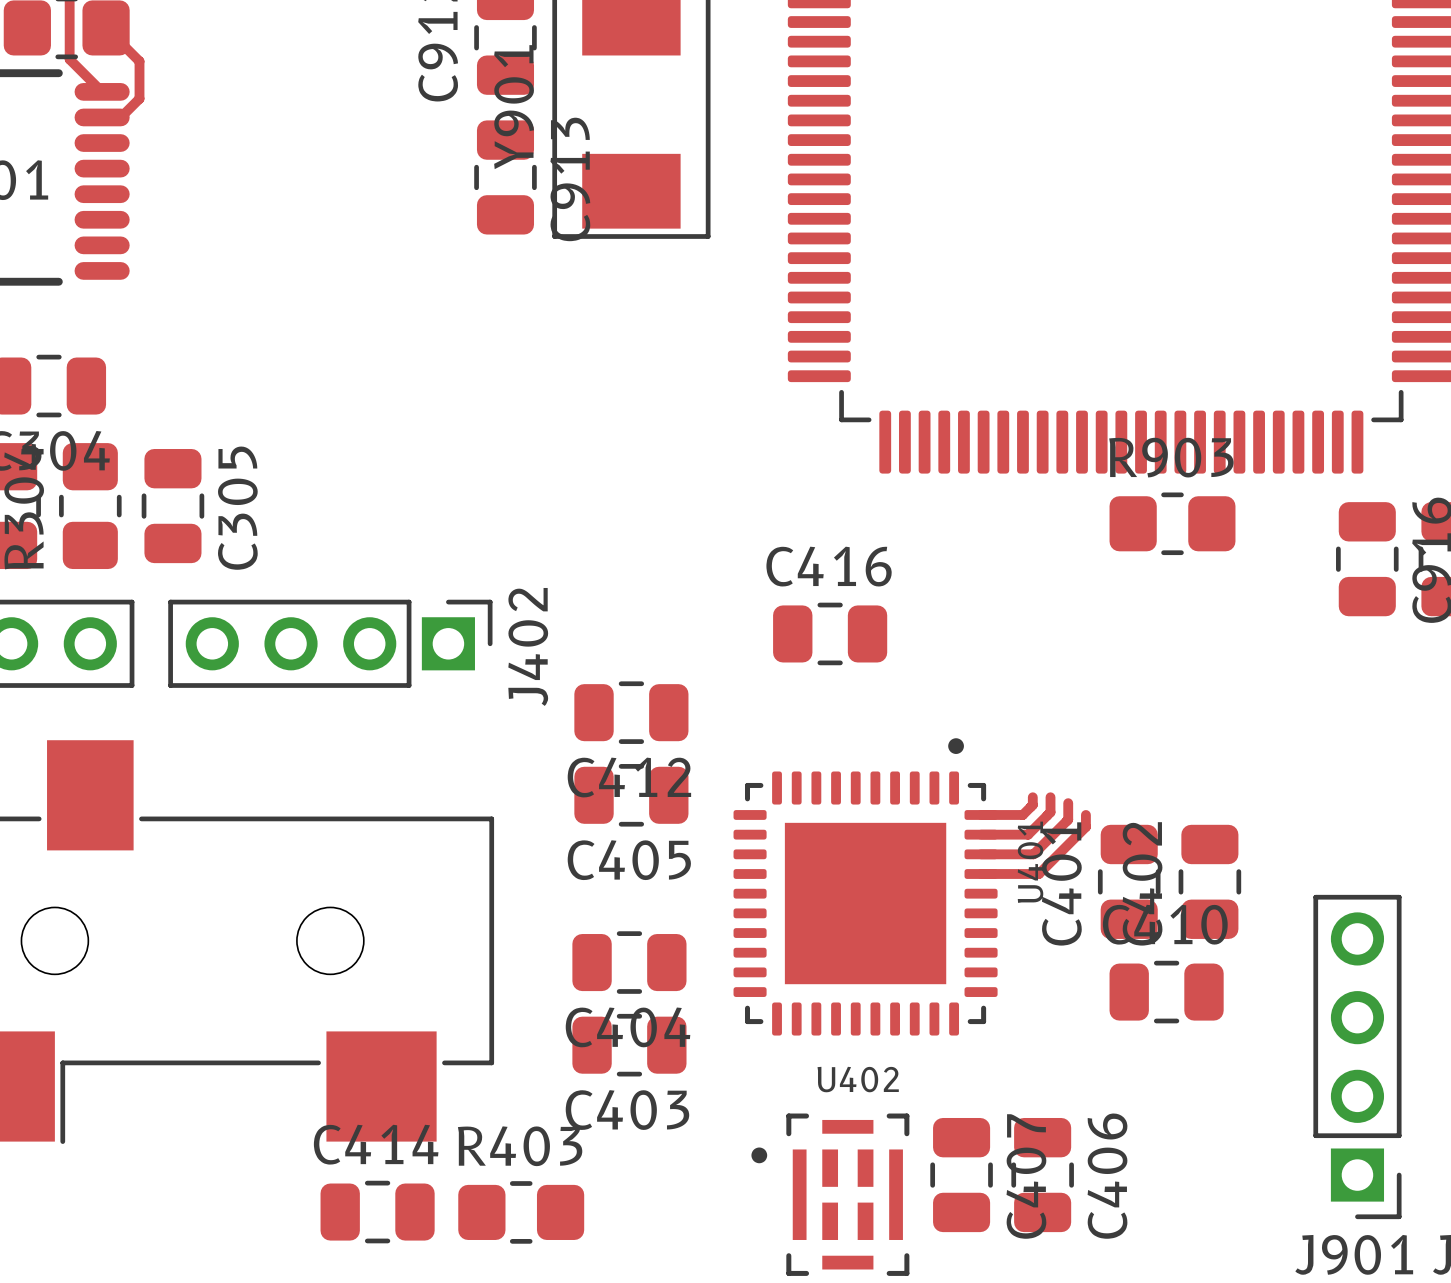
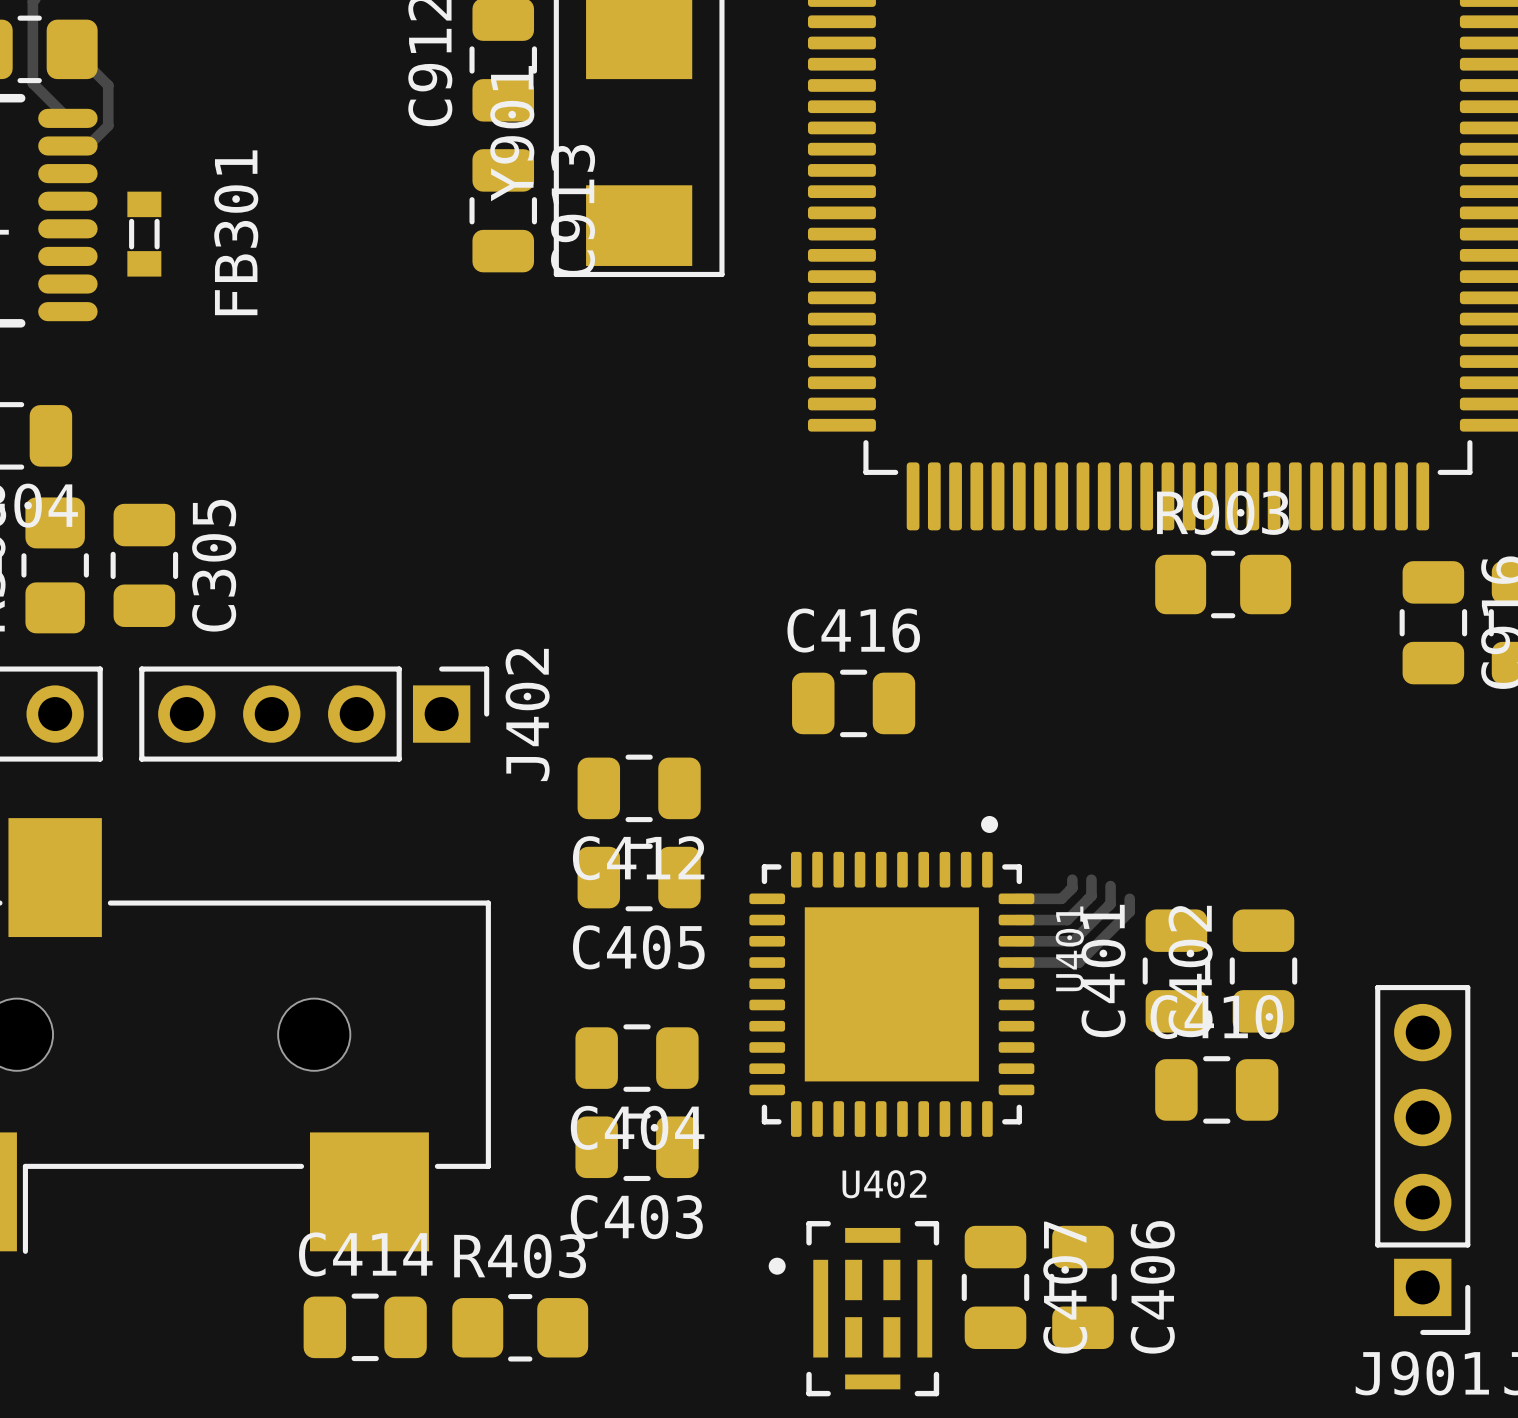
FB301: none -> (144, 234)

